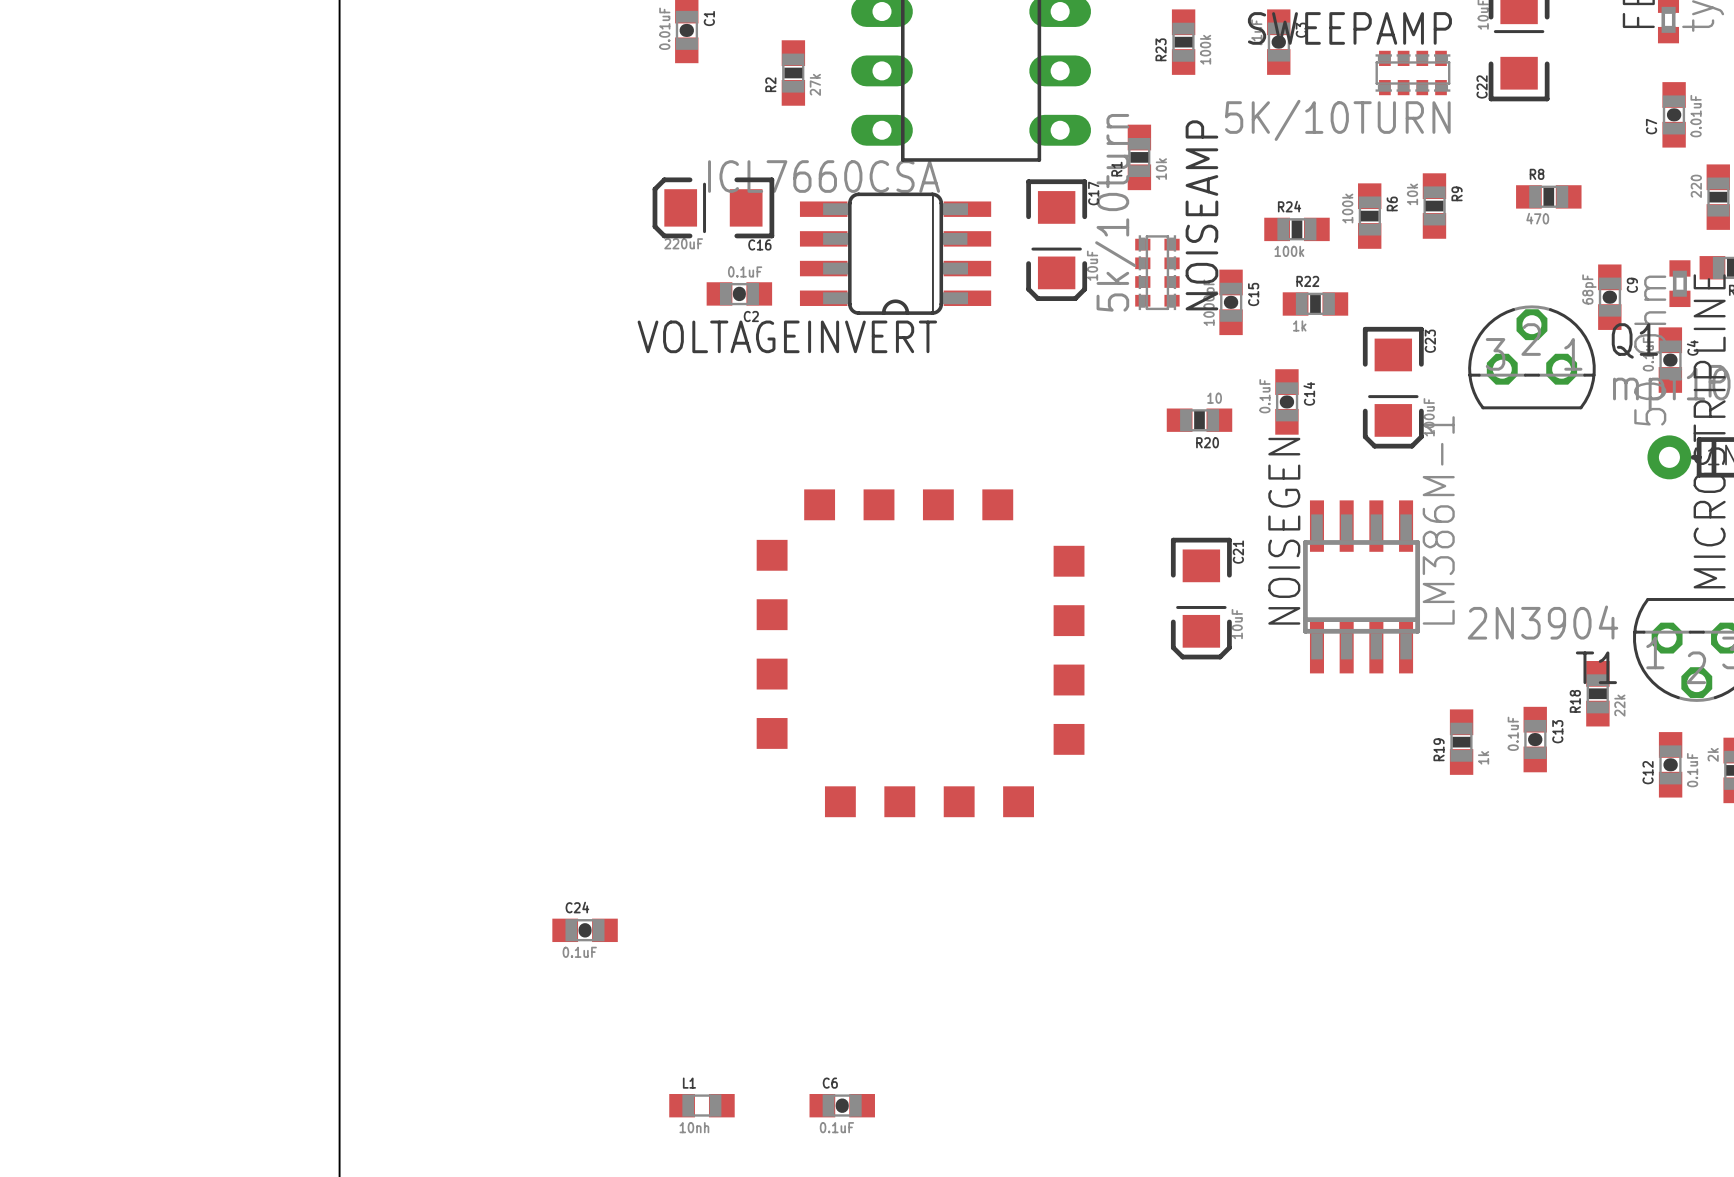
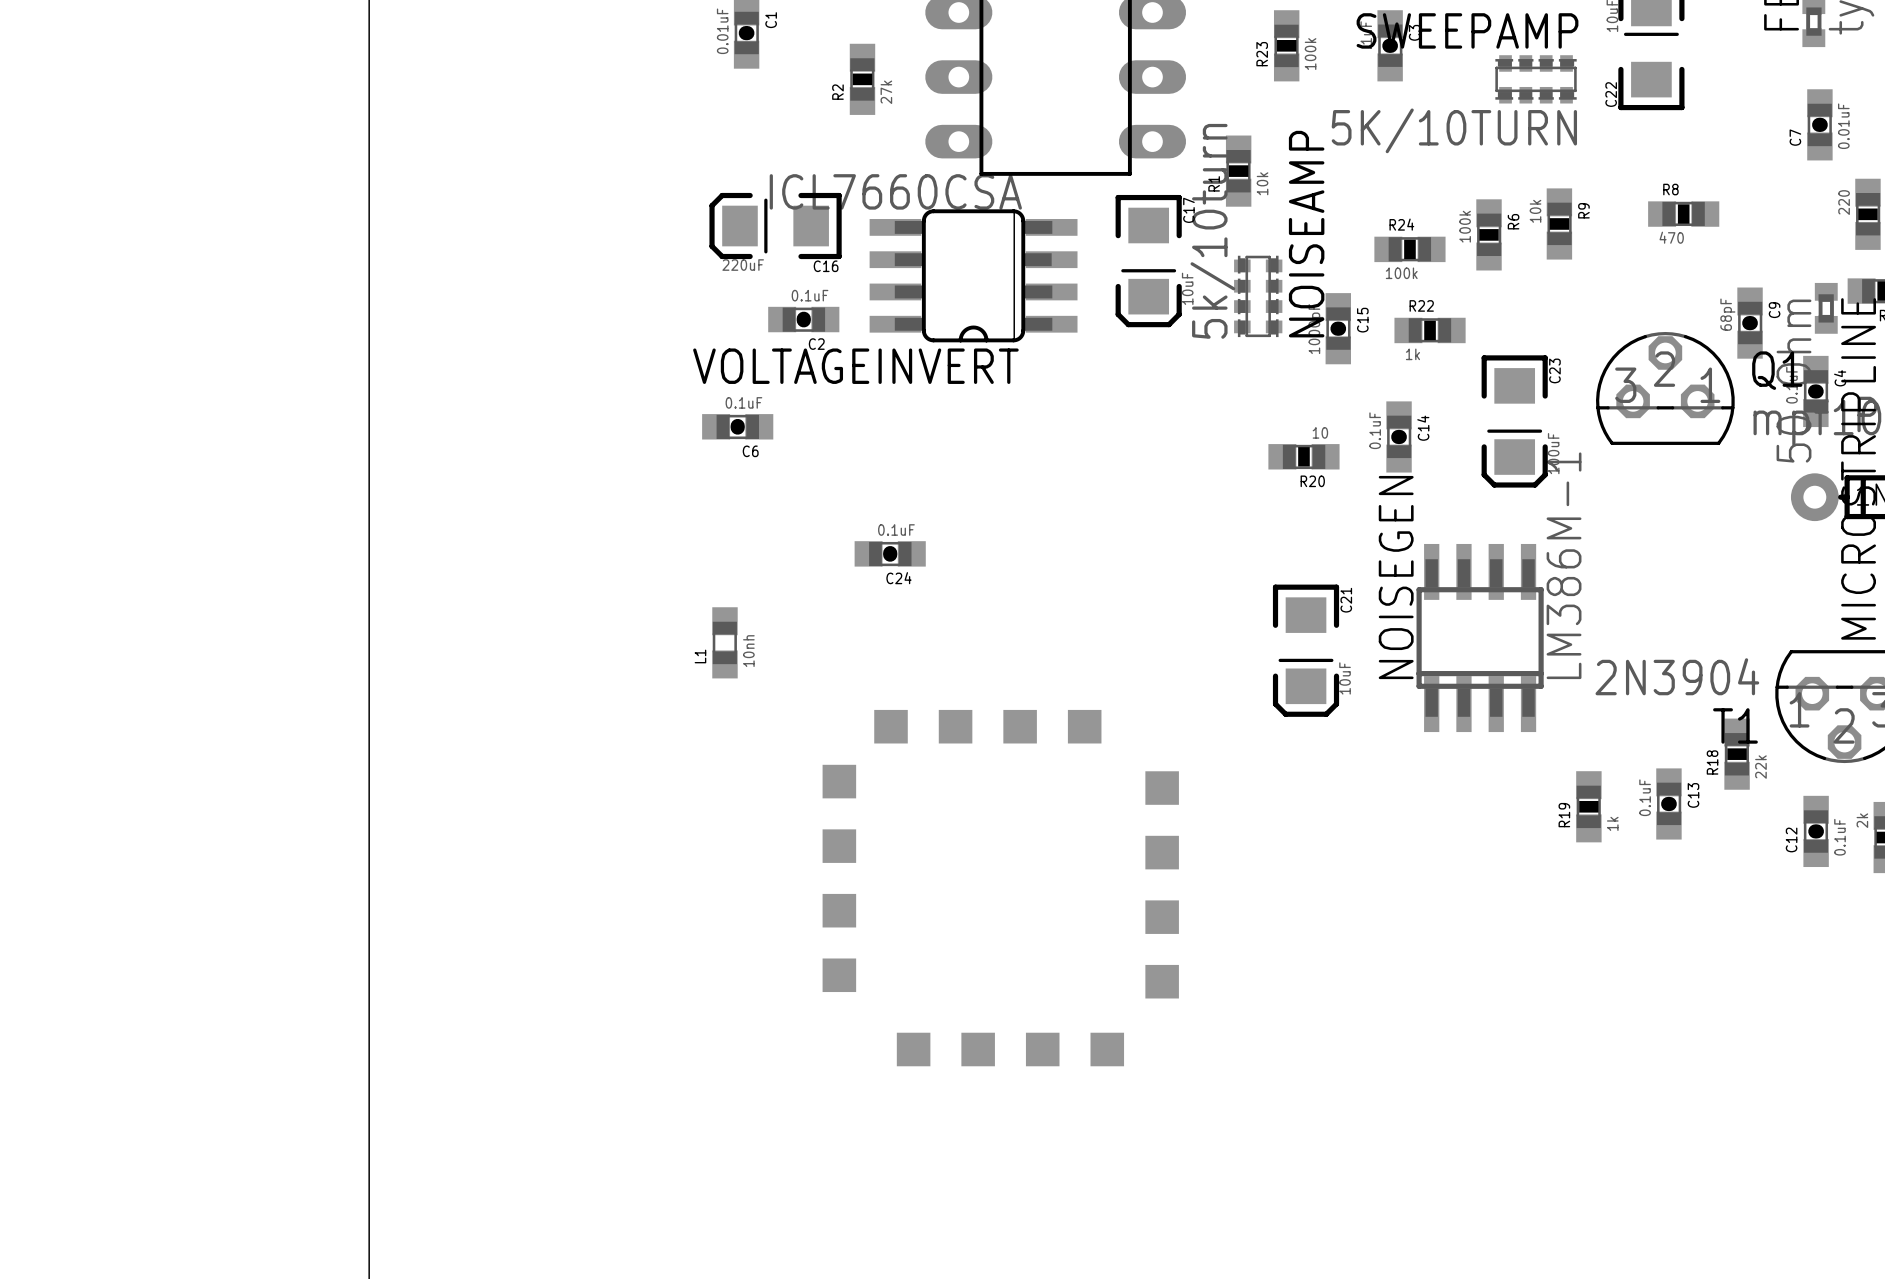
part position: (920, 653) -> (1000, 888)
C24 name position: C24 (577, 907) -> C24 (898, 578)
C24 position: (585, 930) -> (890, 553)
C24 value position: 0.1uF (579, 952) -> 0.1uF (896, 529)
C6 name position: C6 (830, 1083) -> C6 (750, 451)
L1 rotation: 0° (701, 1105) -> 90° clockwise (724, 642)
L1 position: (701, 1105) -> (724, 642)
C6 position: (842, 1105) -> (737, 426)
C6 value position: 0.1uF (836, 1127) -> 0.1uF (743, 402)

